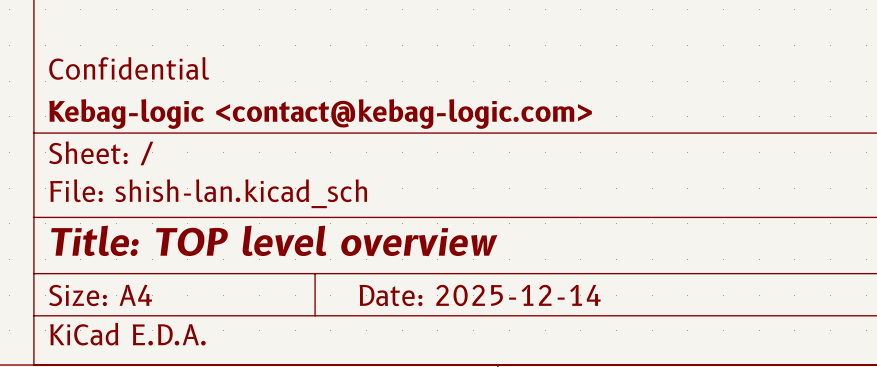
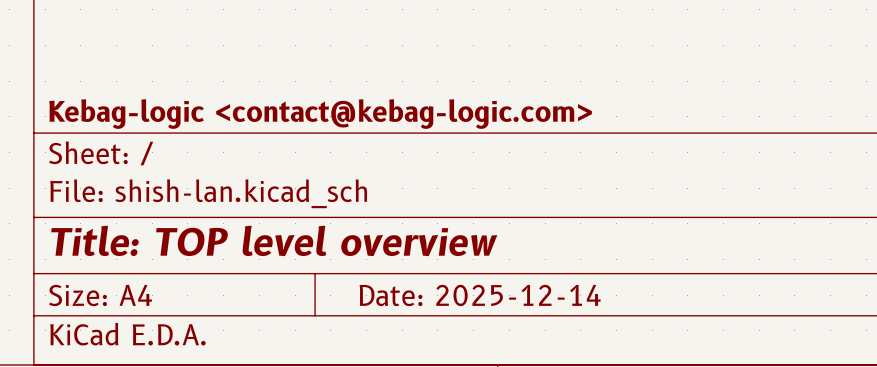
title block: Confidential (129, 68) -> none

